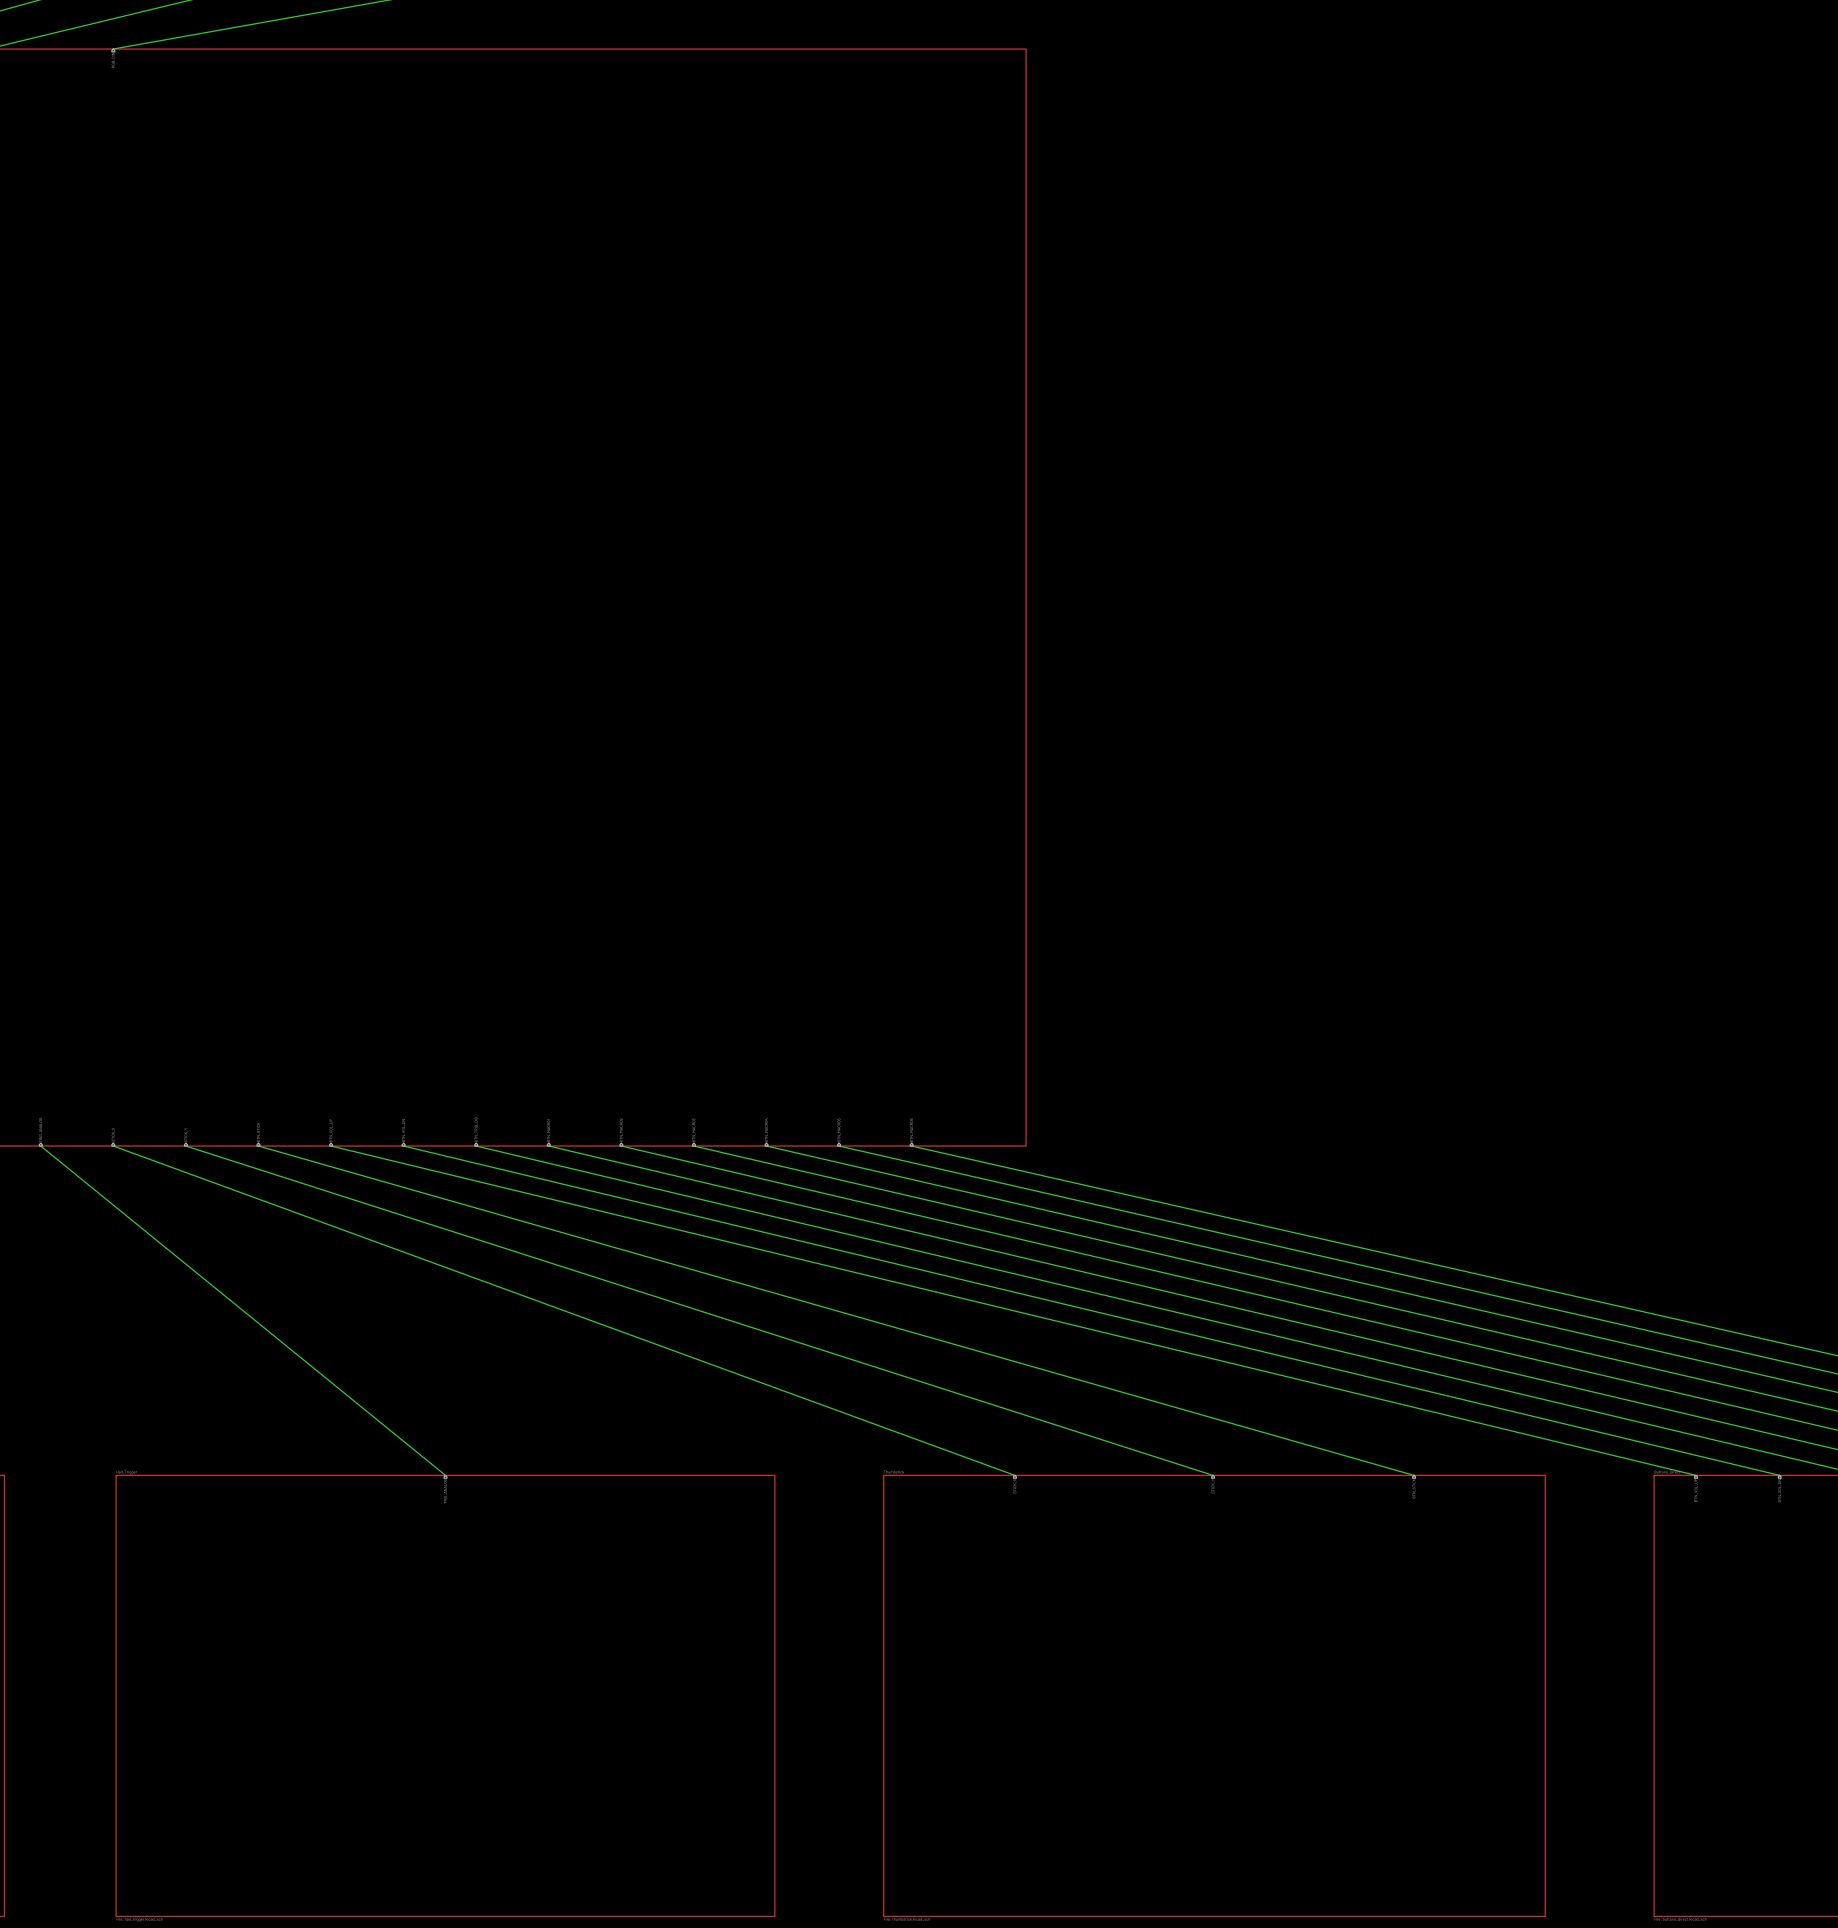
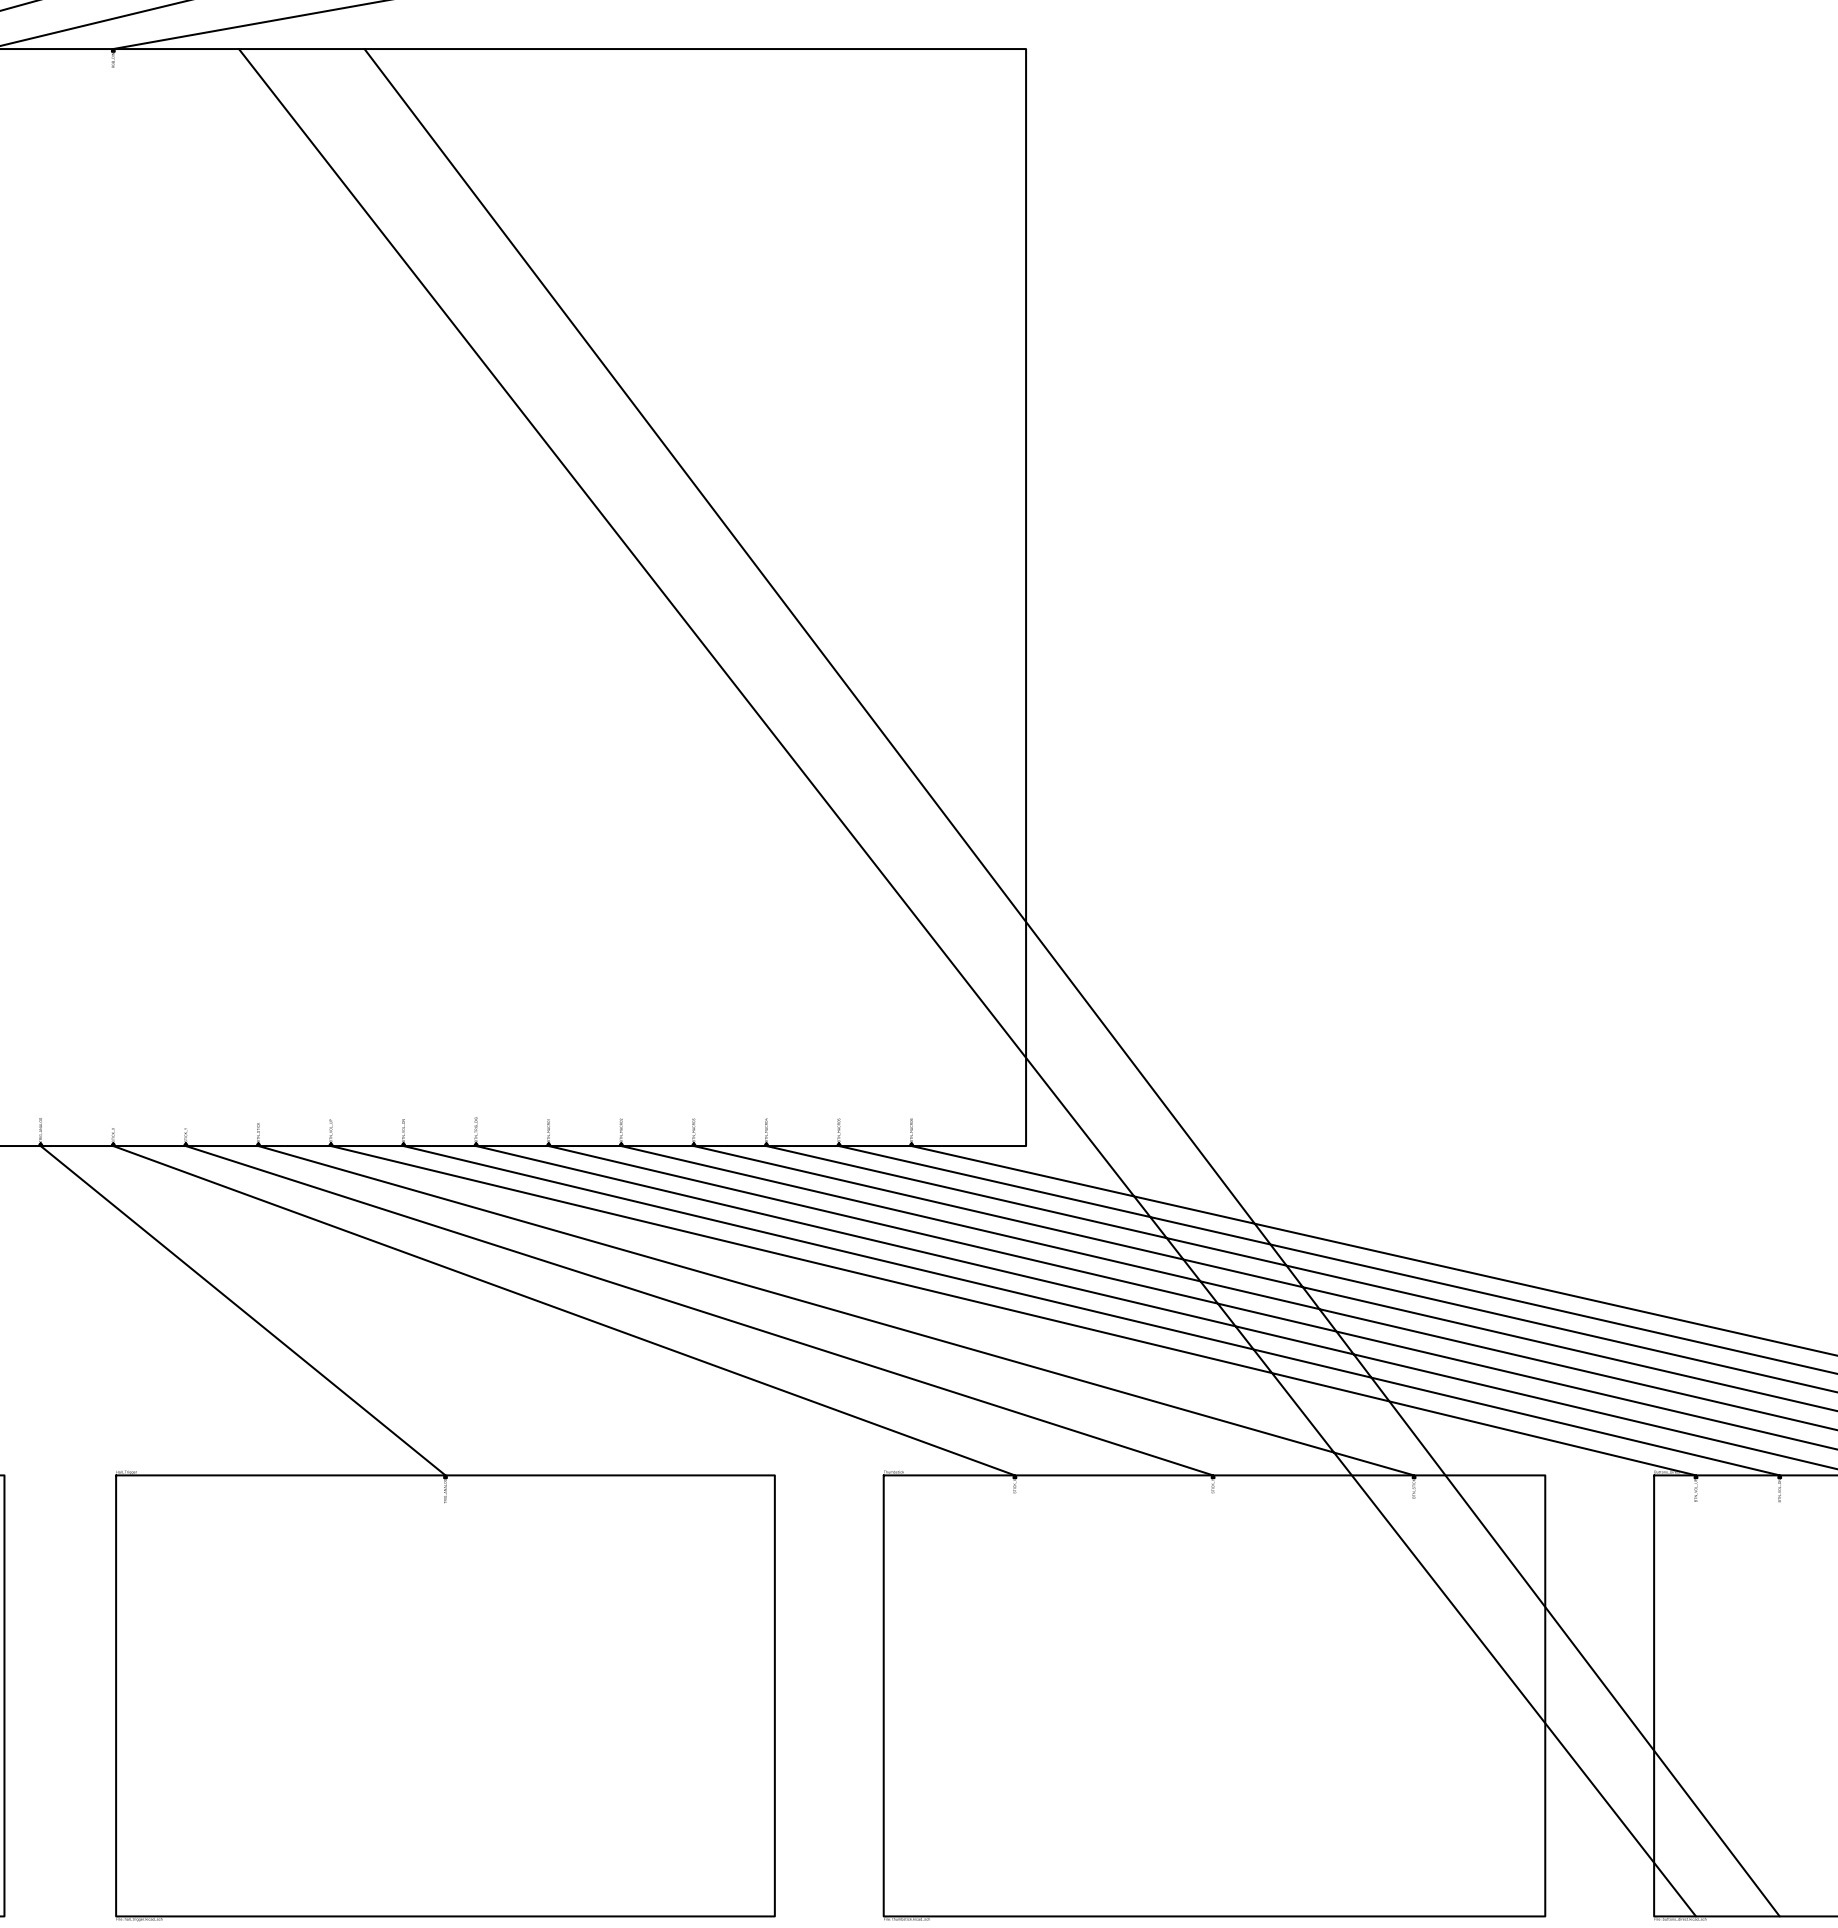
wire: none -> (238, 49) (1695, 1916)
wire: none -> (364, 49) (1779, 1916)

